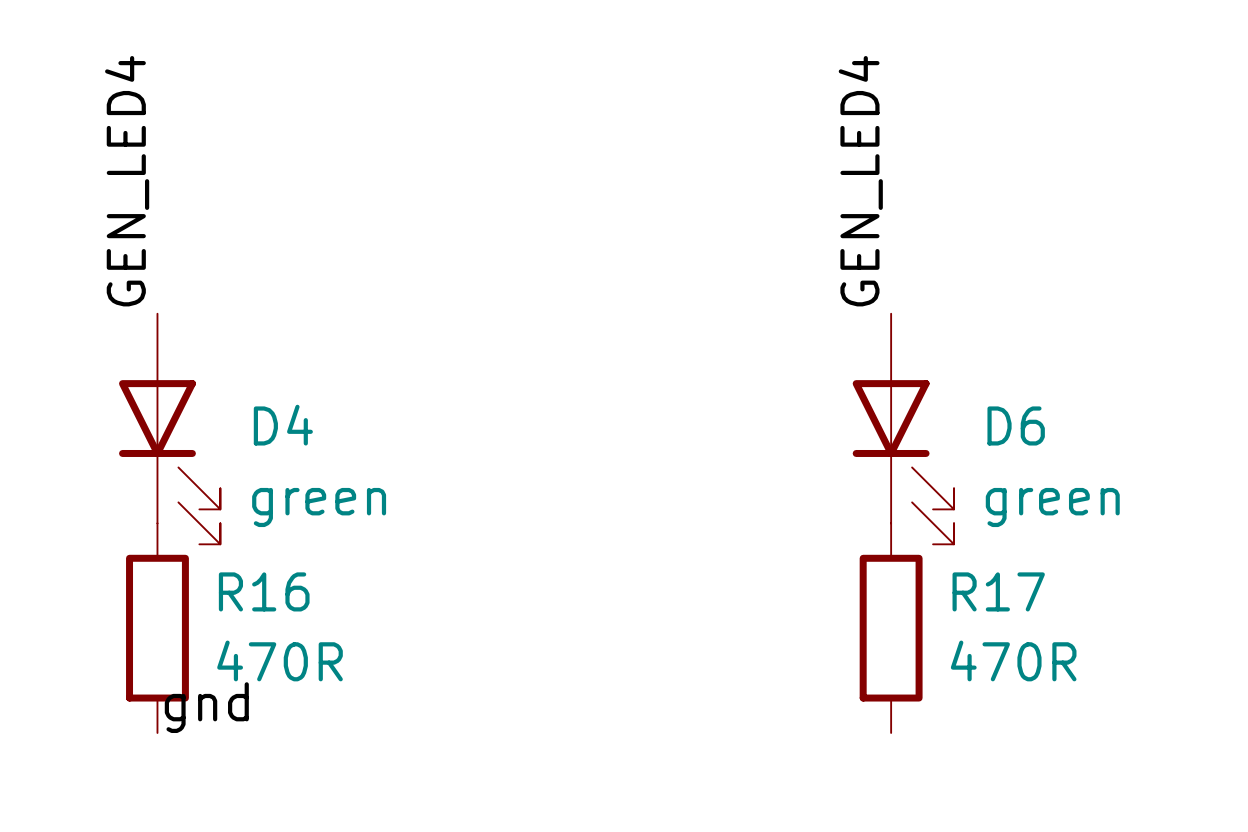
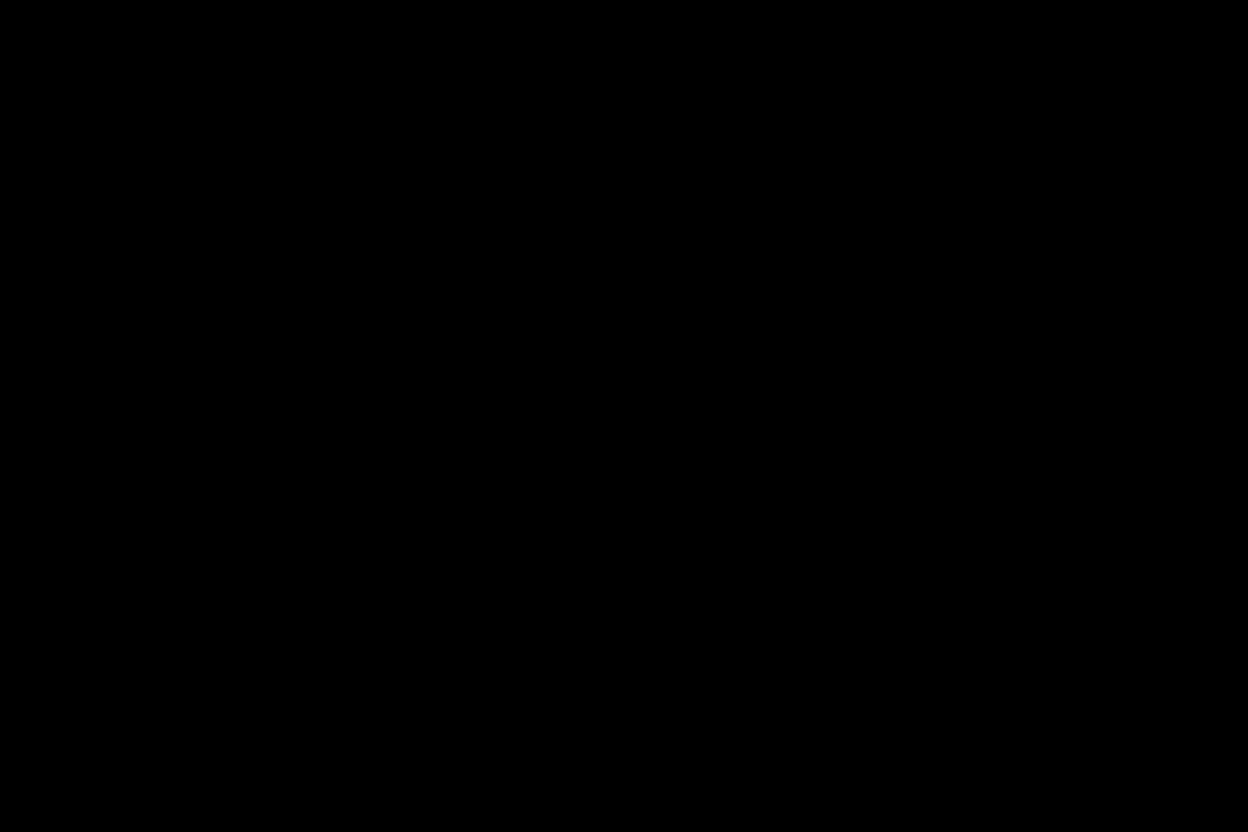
label: GEN_LED4 (127, 181) -> none
label: GEN_LED4 (860, 181) -> none
D4: green (169, 429) -> none
D6: green (903, 429) -> none
R16: 470R (157, 628) -> none
R17: 470R (891, 628) -> none
label: gnd (206, 707) -> none

